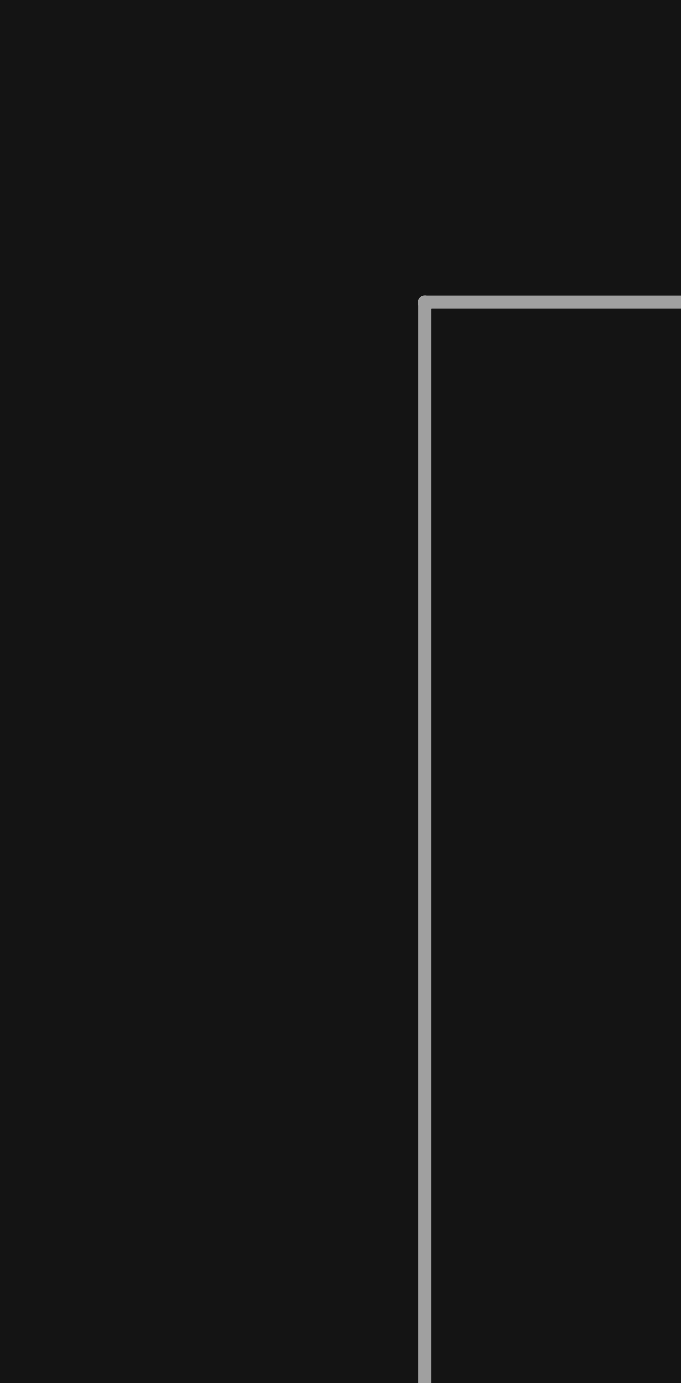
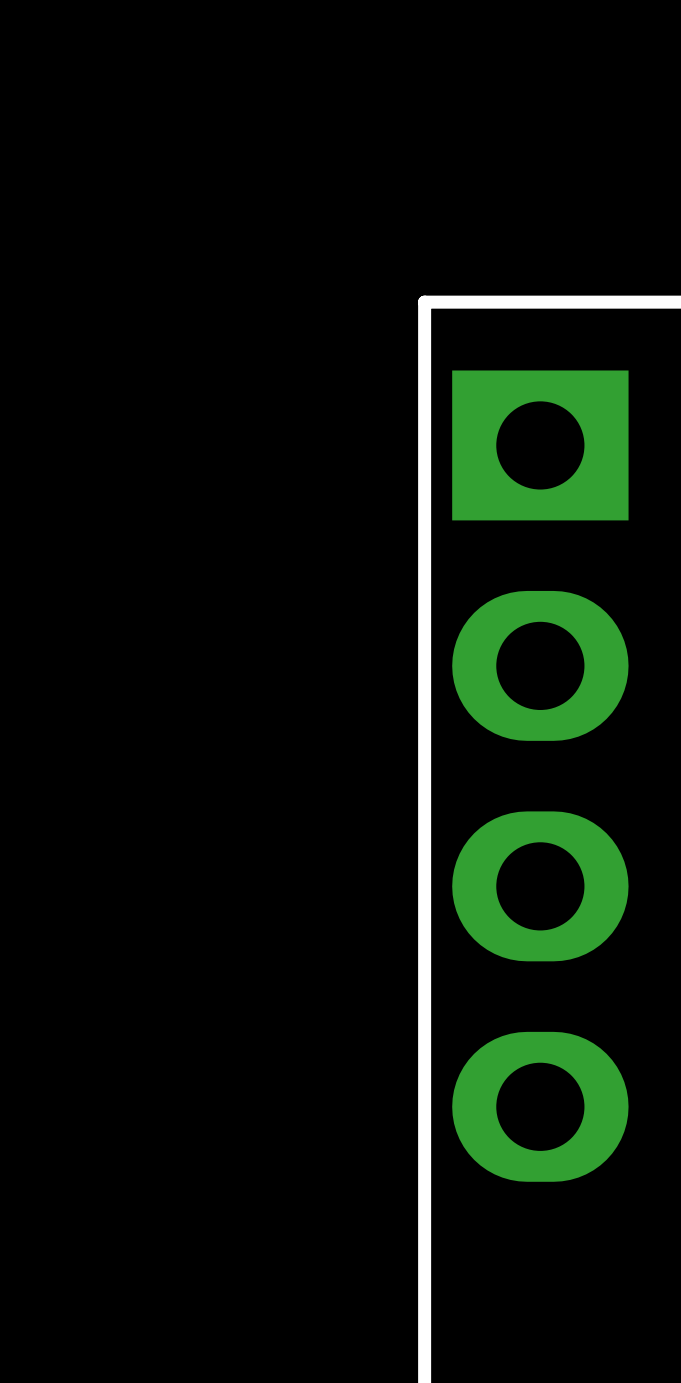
part: none -> (540, 776)

